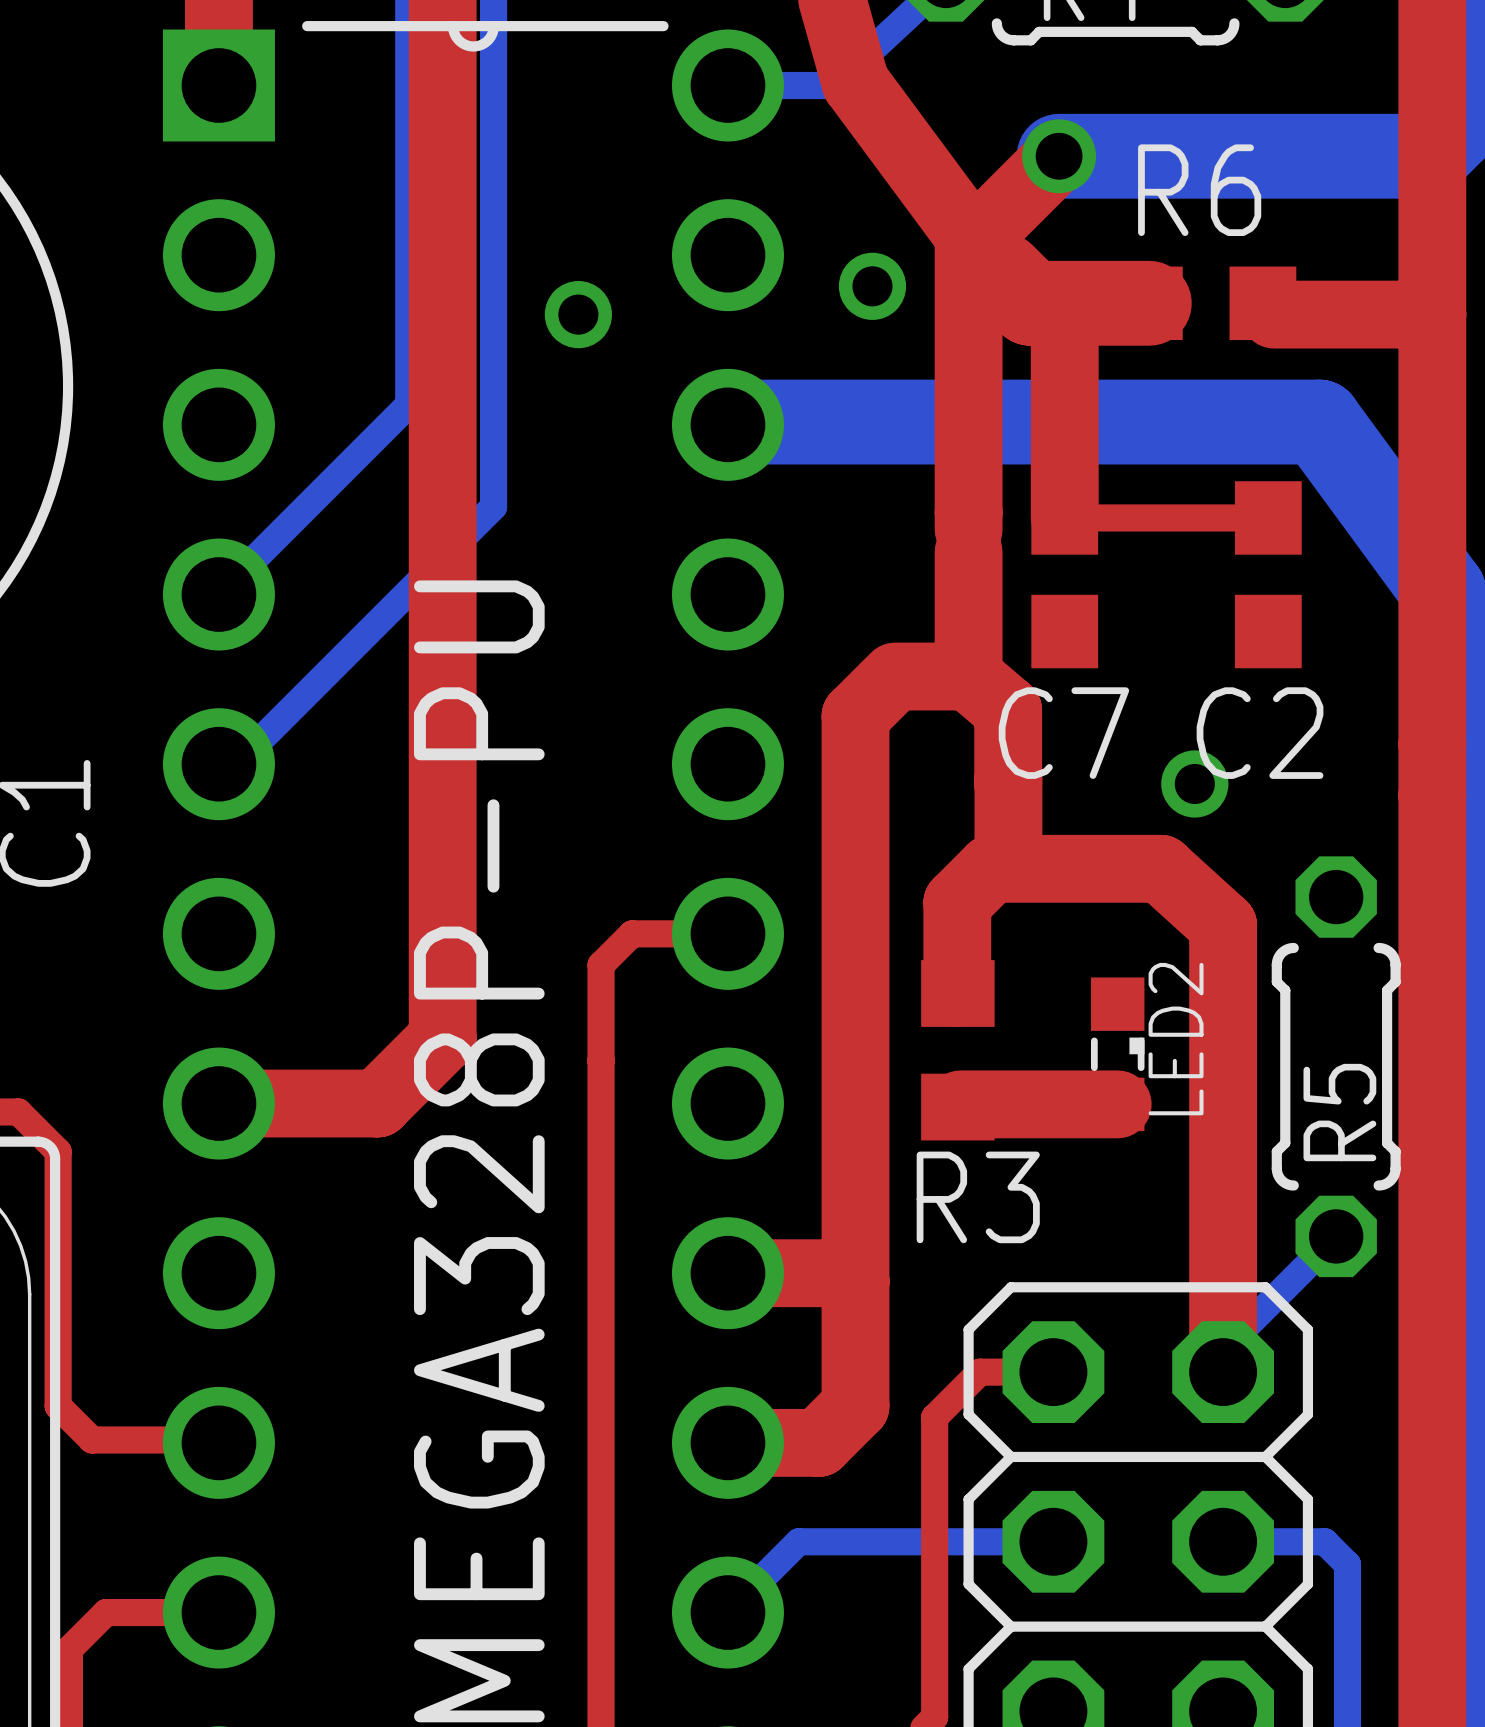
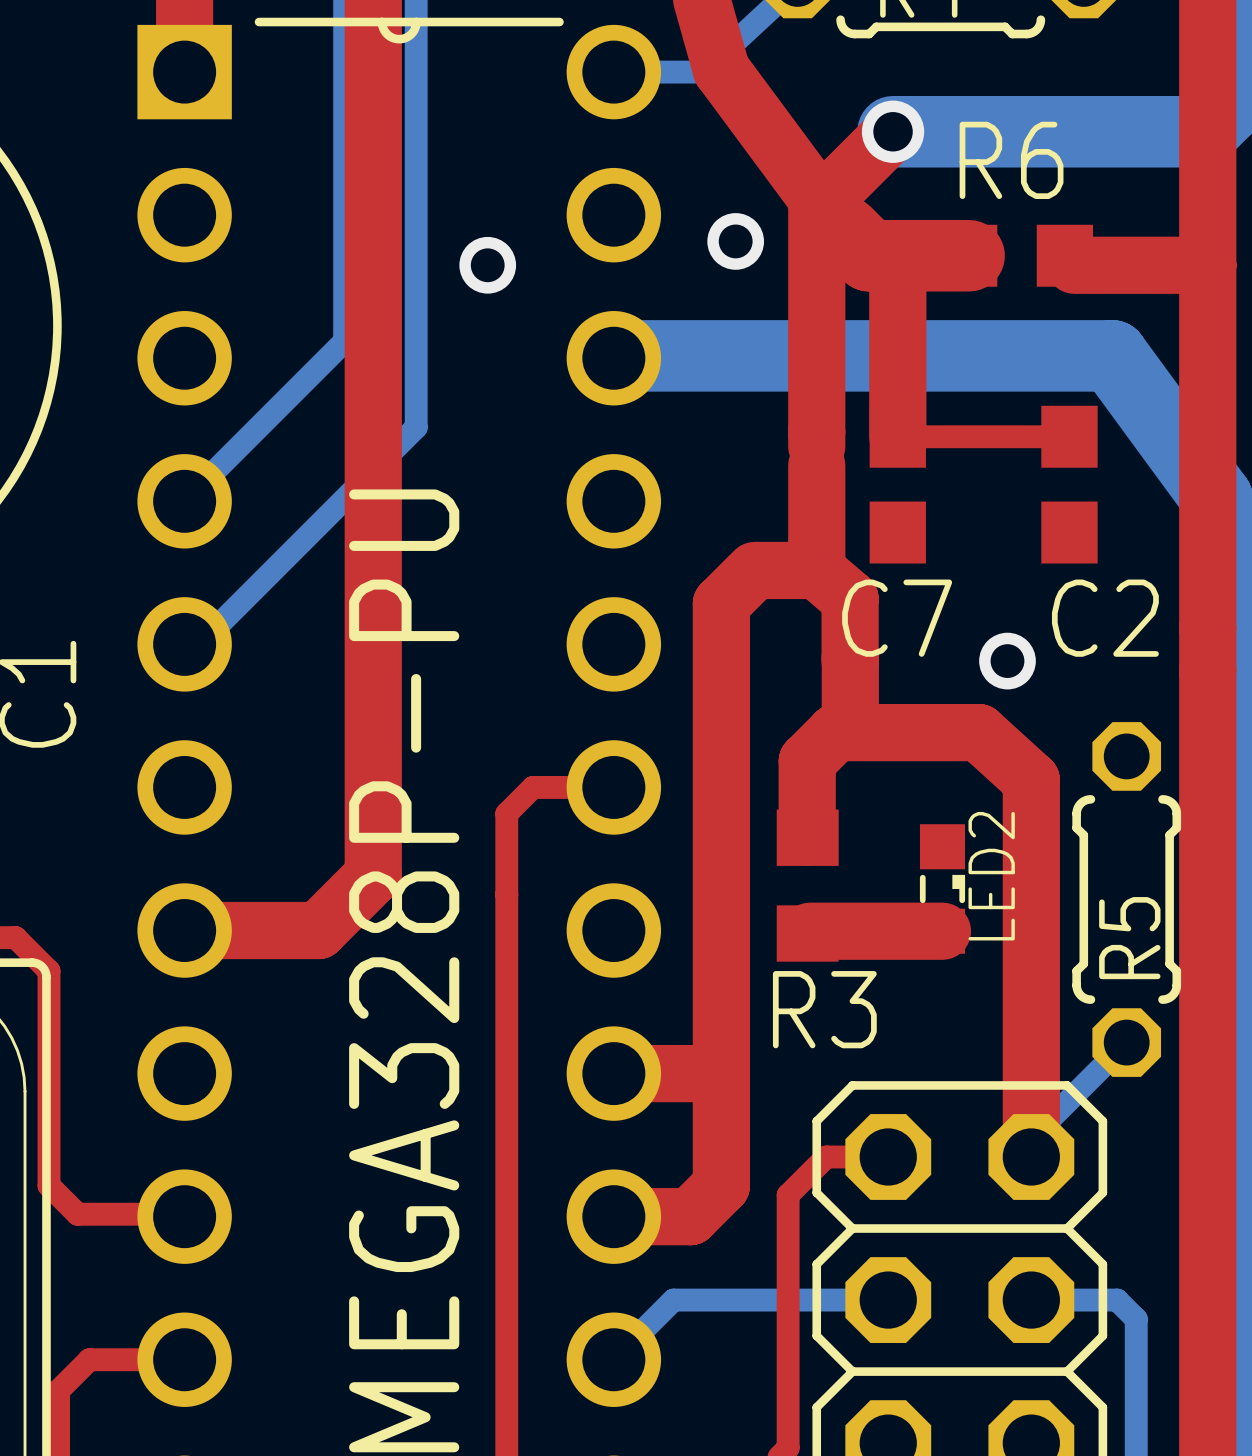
C2 name position: C2 (1260, 733) -> C2 (1105, 618)

